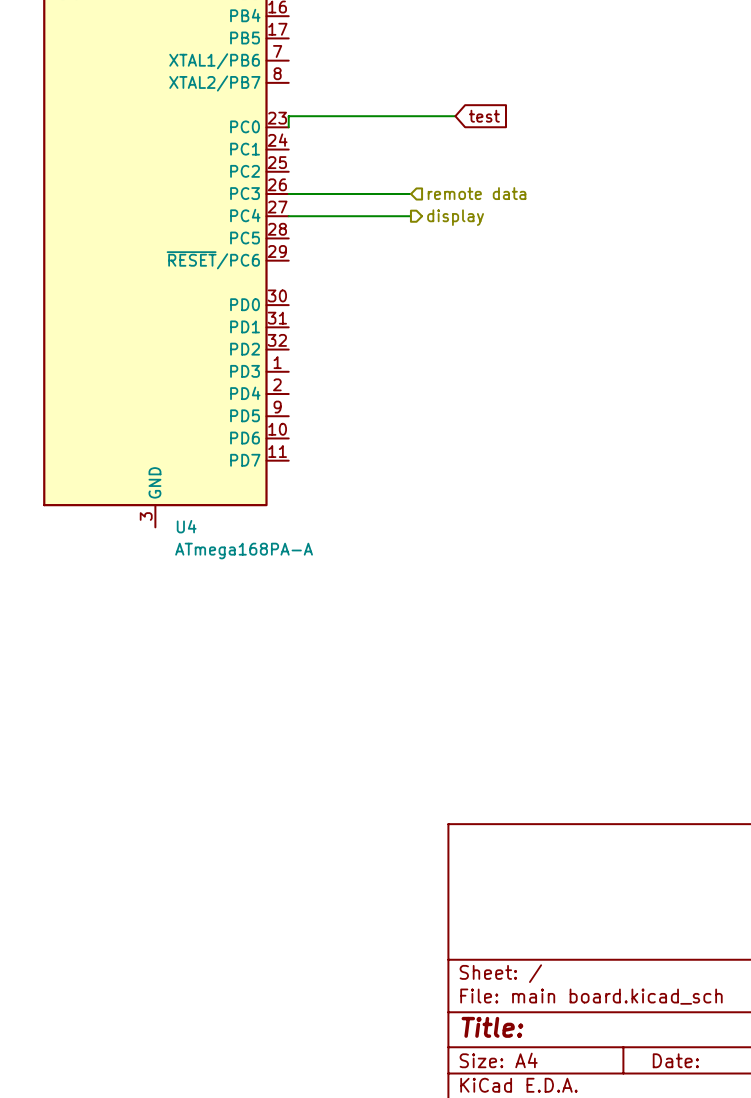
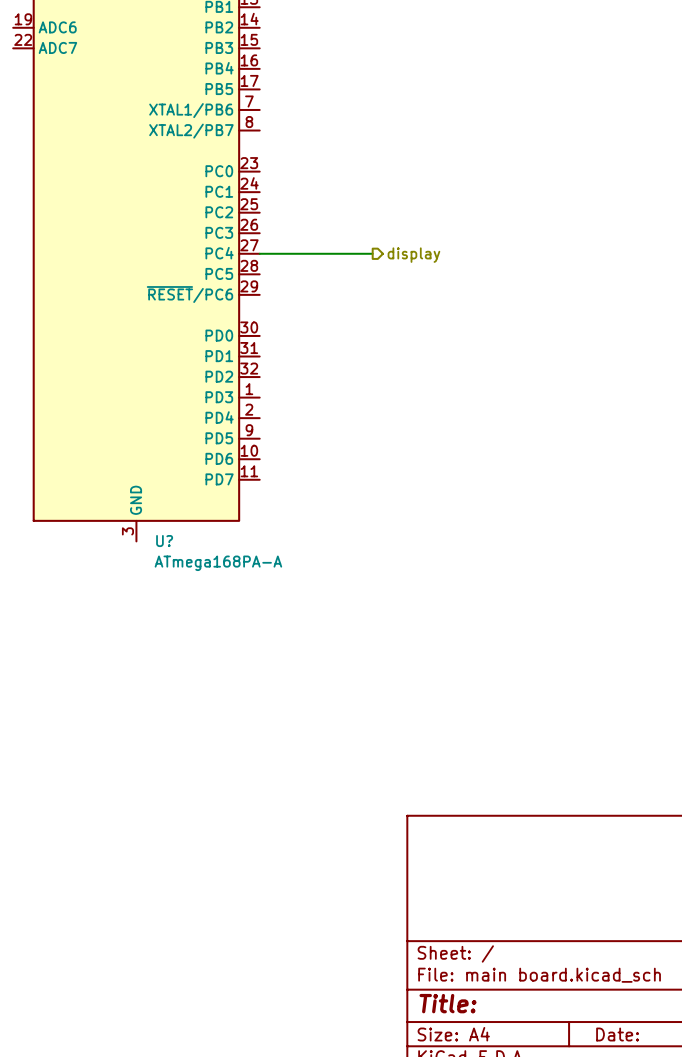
wire: (455, 116) (288, 116) (288, 127) -> none
global label: test (484, 116) -> none
wire: (288, 193) (410, 193) -> none
hierarchical label: remote data (477, 193) -> none
U4 name: U4 (186, 526) -> U? (164, 541)

